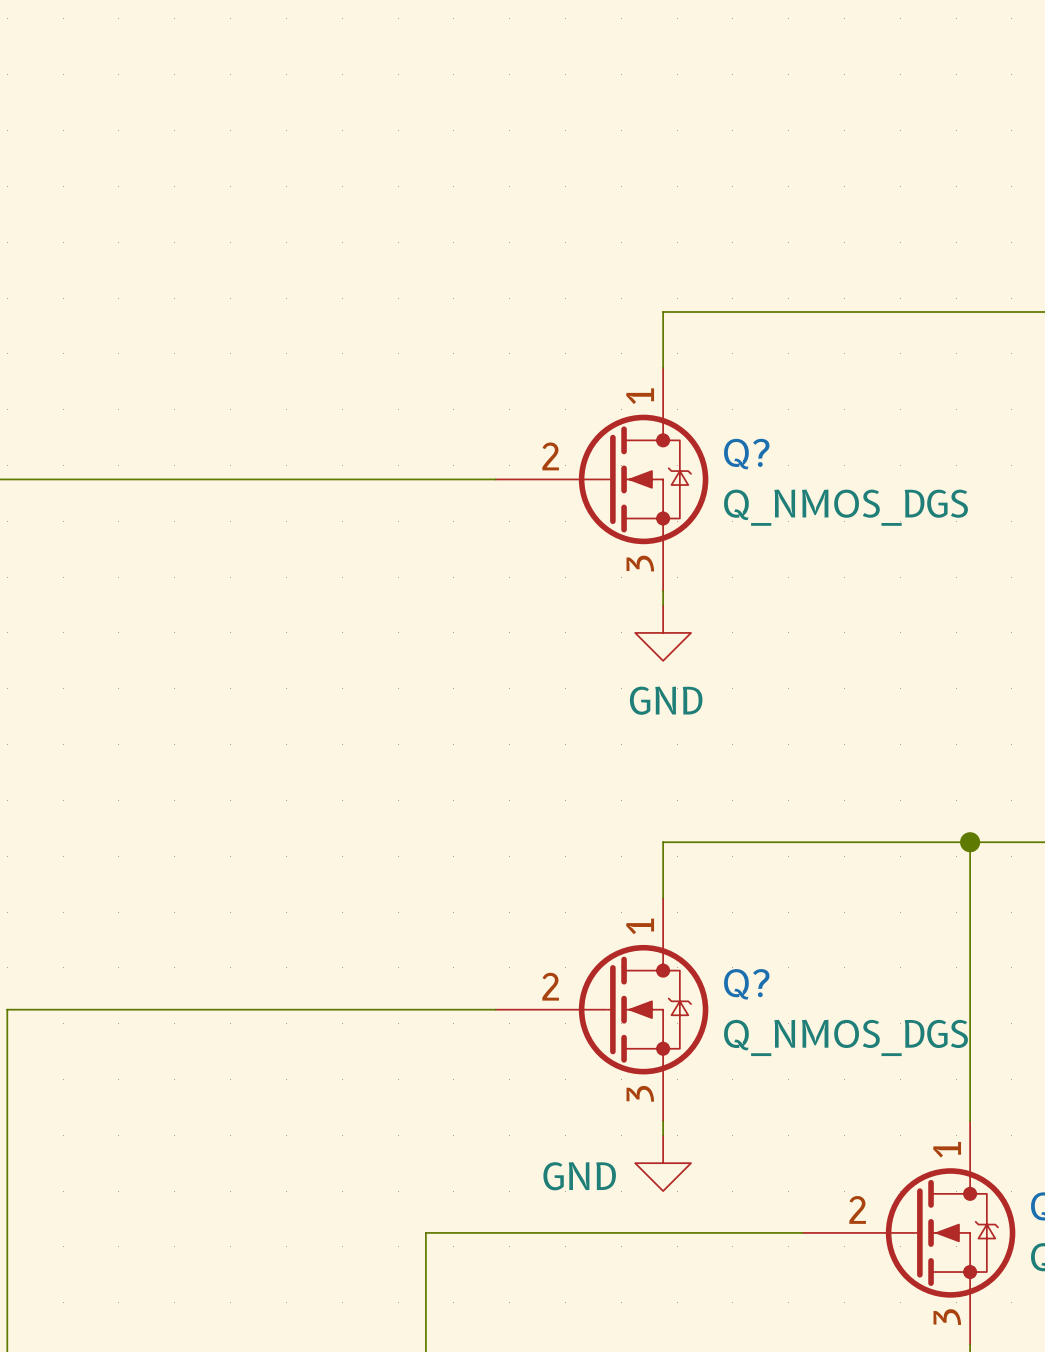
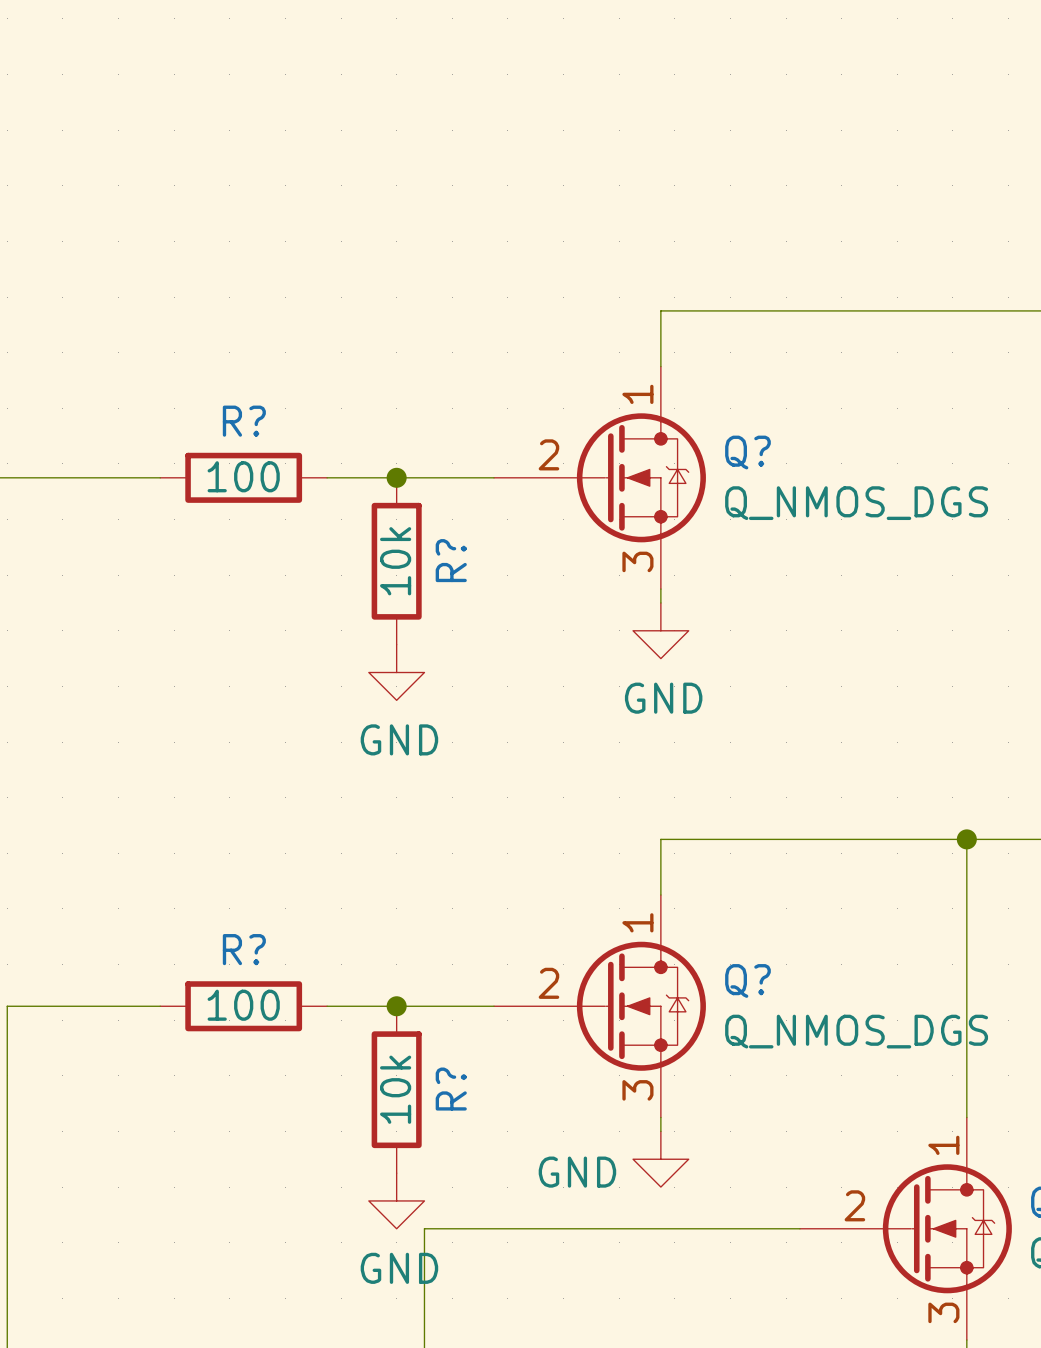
wire: (160, 479) (328, 479) -> none
R?: none -> 100 (243, 477)
junction: none -> (396, 477)
R?: none -> 10k (396, 561)
power symbol: none -> GND (396, 672)
wire: (160, 1009) (328, 1009) -> none
R?: none -> 100 (243, 1006)
junction: none -> (396, 1006)
R?: none -> 10k (396, 1089)
power symbol: none -> GND (396, 1200)

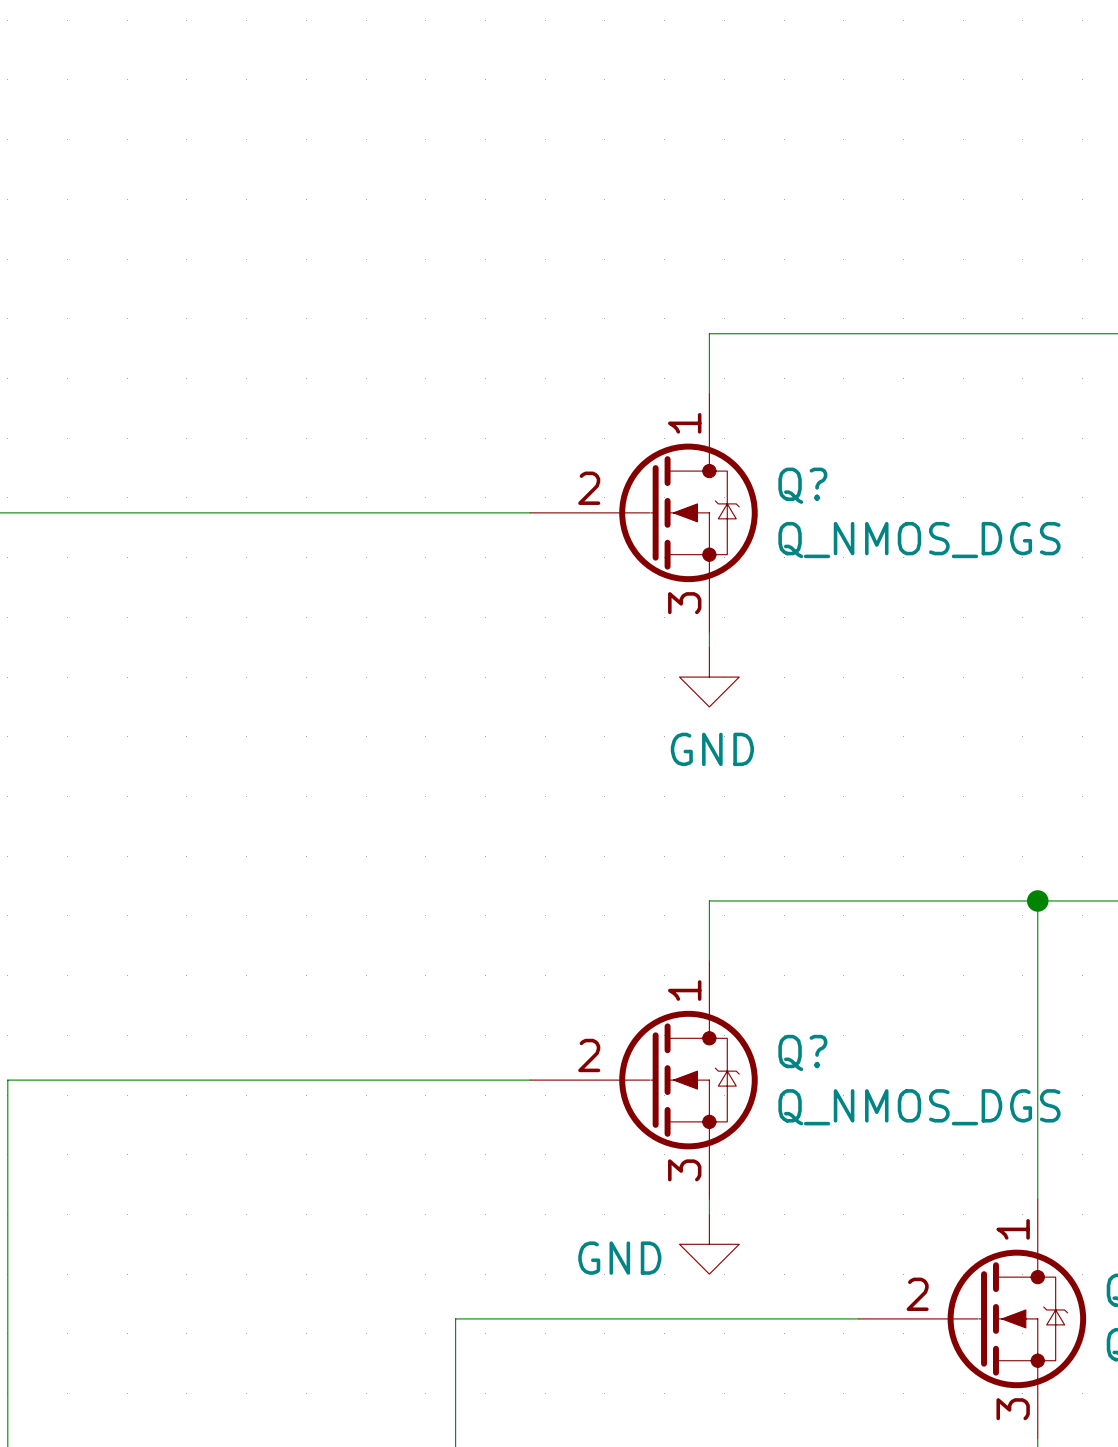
wire: none -> (172, 512) (351, 512)
R?: 100 (243, 477) -> none
junction: (396, 477) -> none
R?: 10k (396, 561) -> none
power symbol: GND (396, 672) -> none
wire: none -> (172, 1080) (351, 1080)
R?: 100 (243, 1006) -> none
junction: (396, 1006) -> none
R?: 10k (396, 1089) -> none
power symbol: GND (396, 1200) -> none

